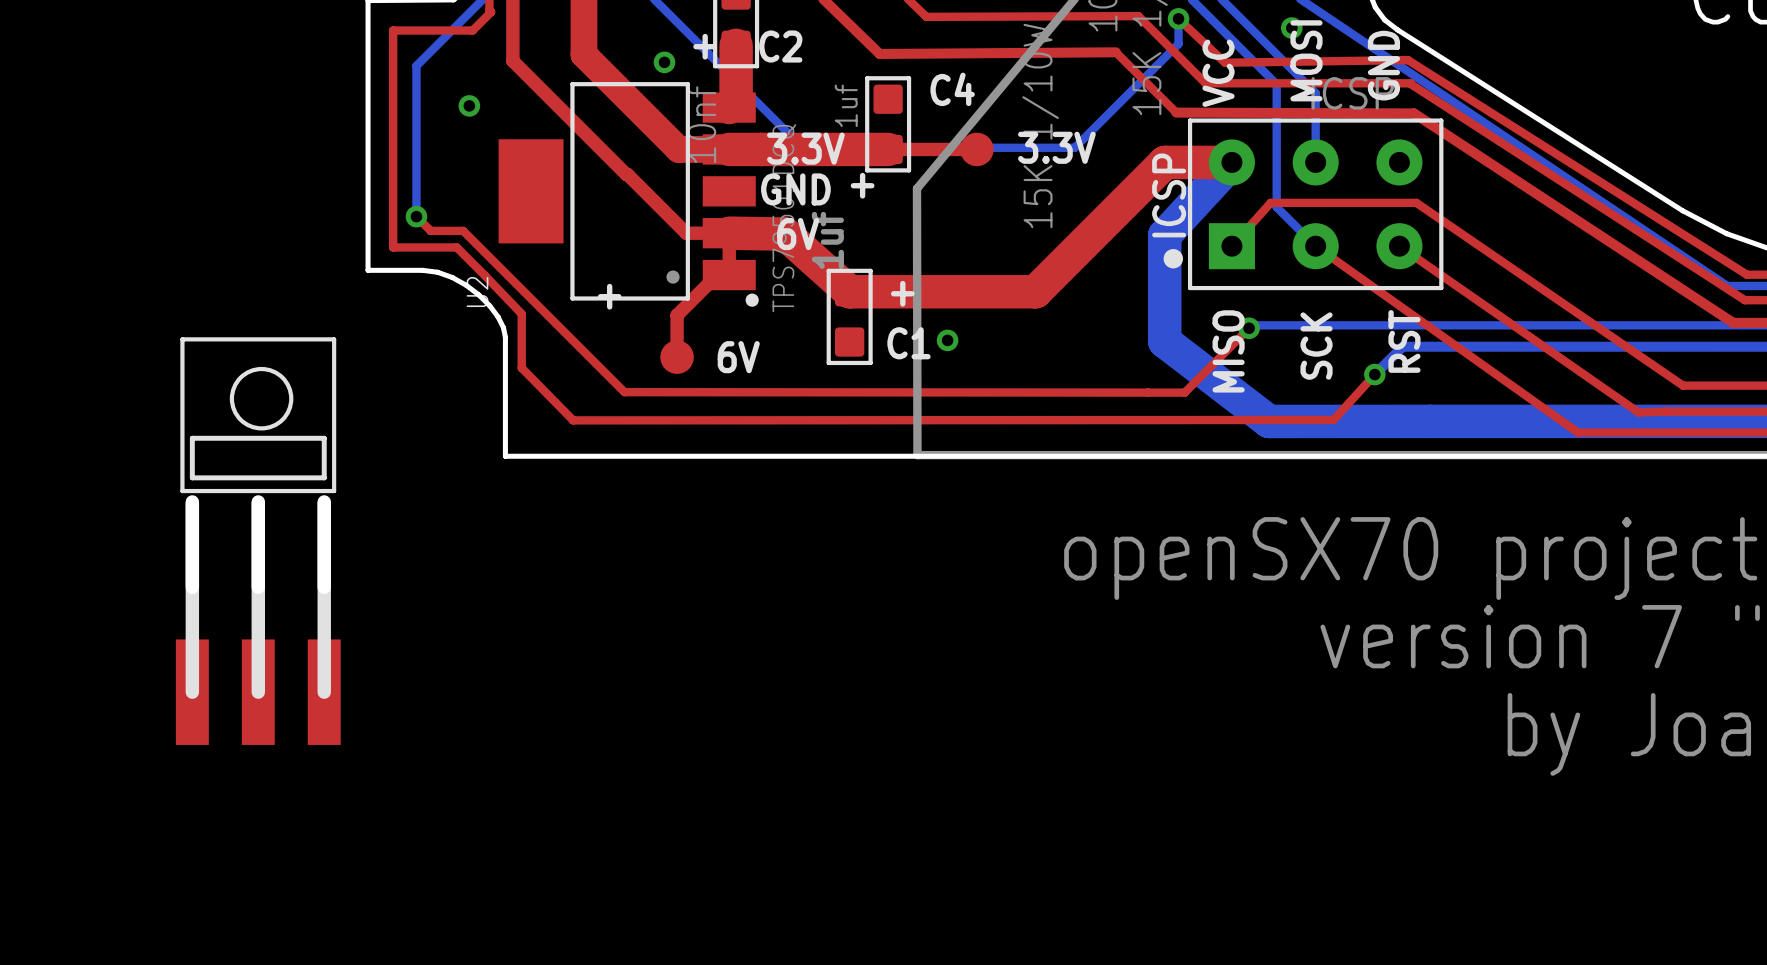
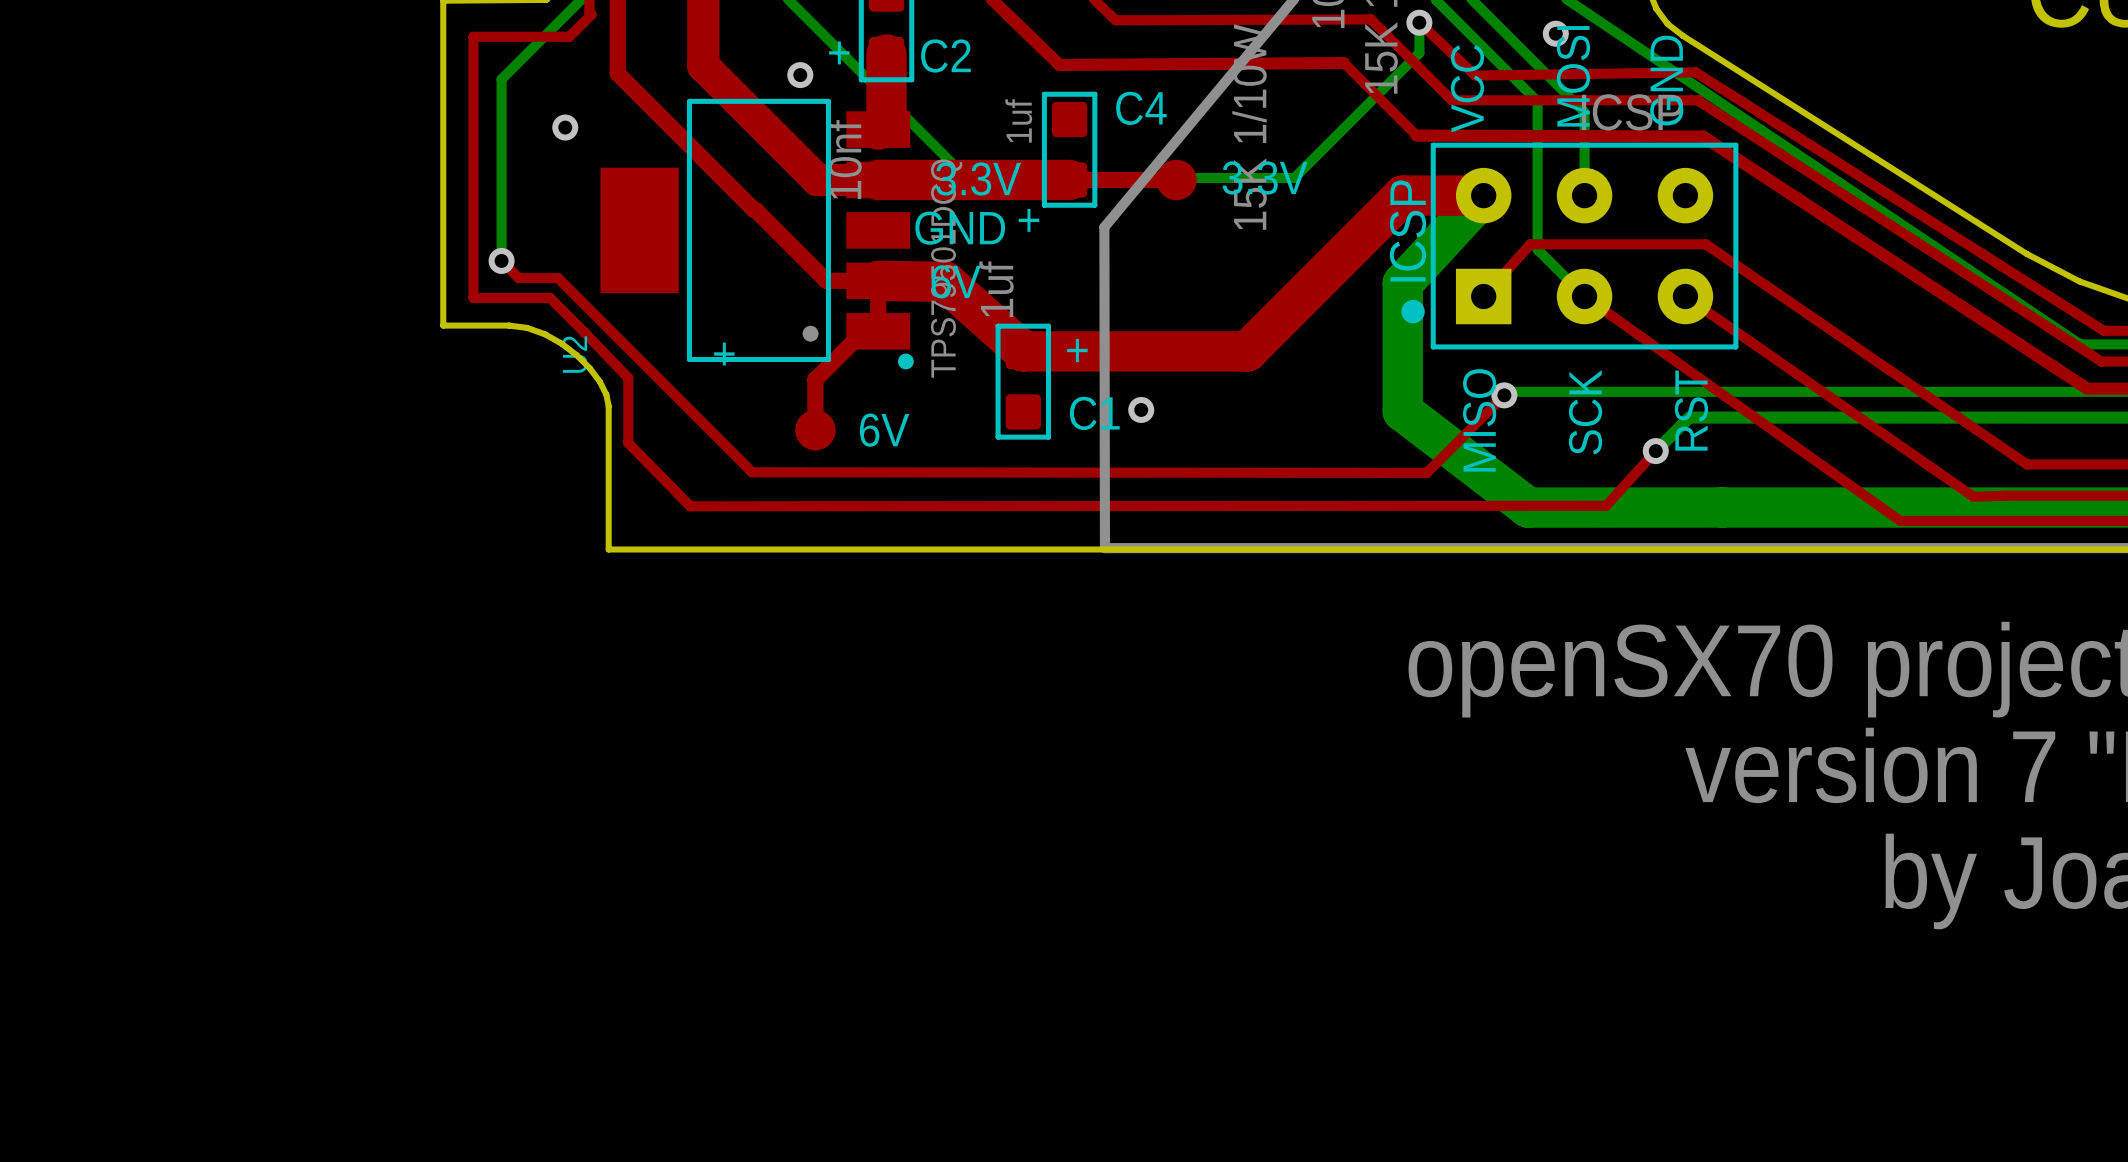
part: (258, 541) -> none

